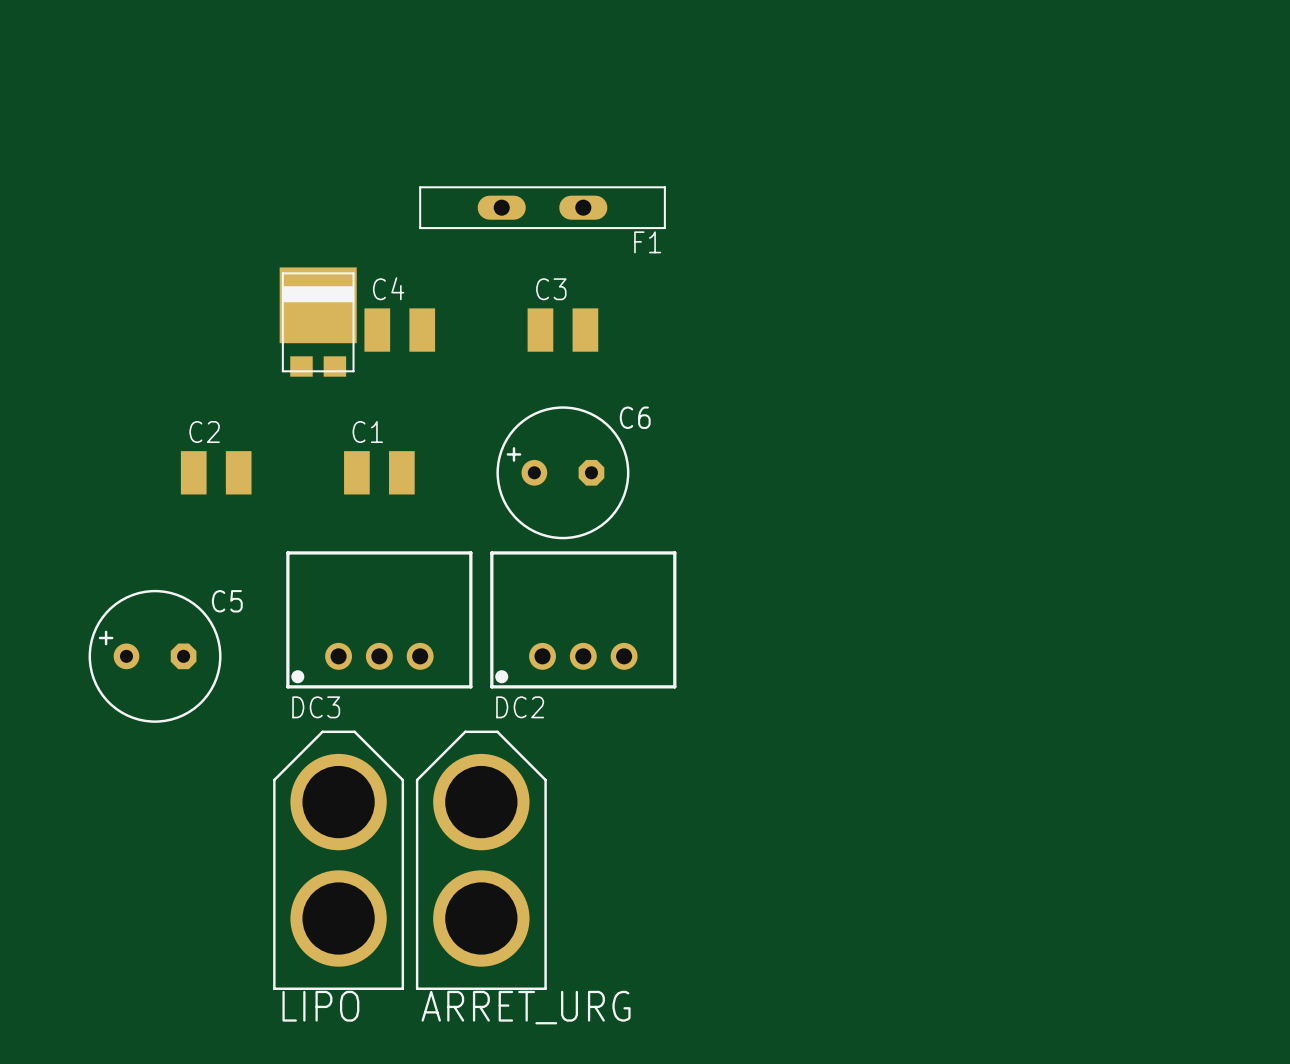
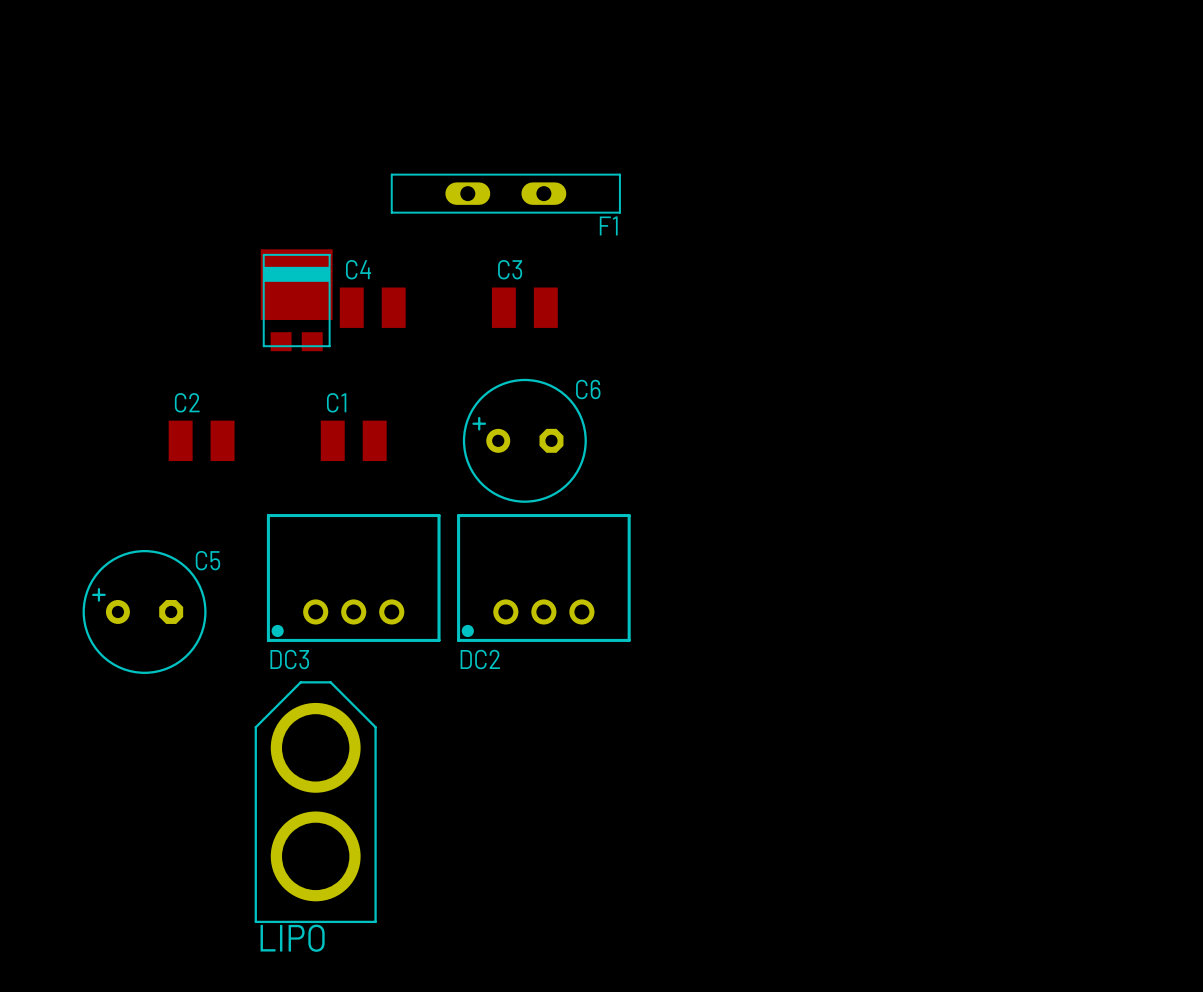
ARRET_URG: (481, 860) -> none

